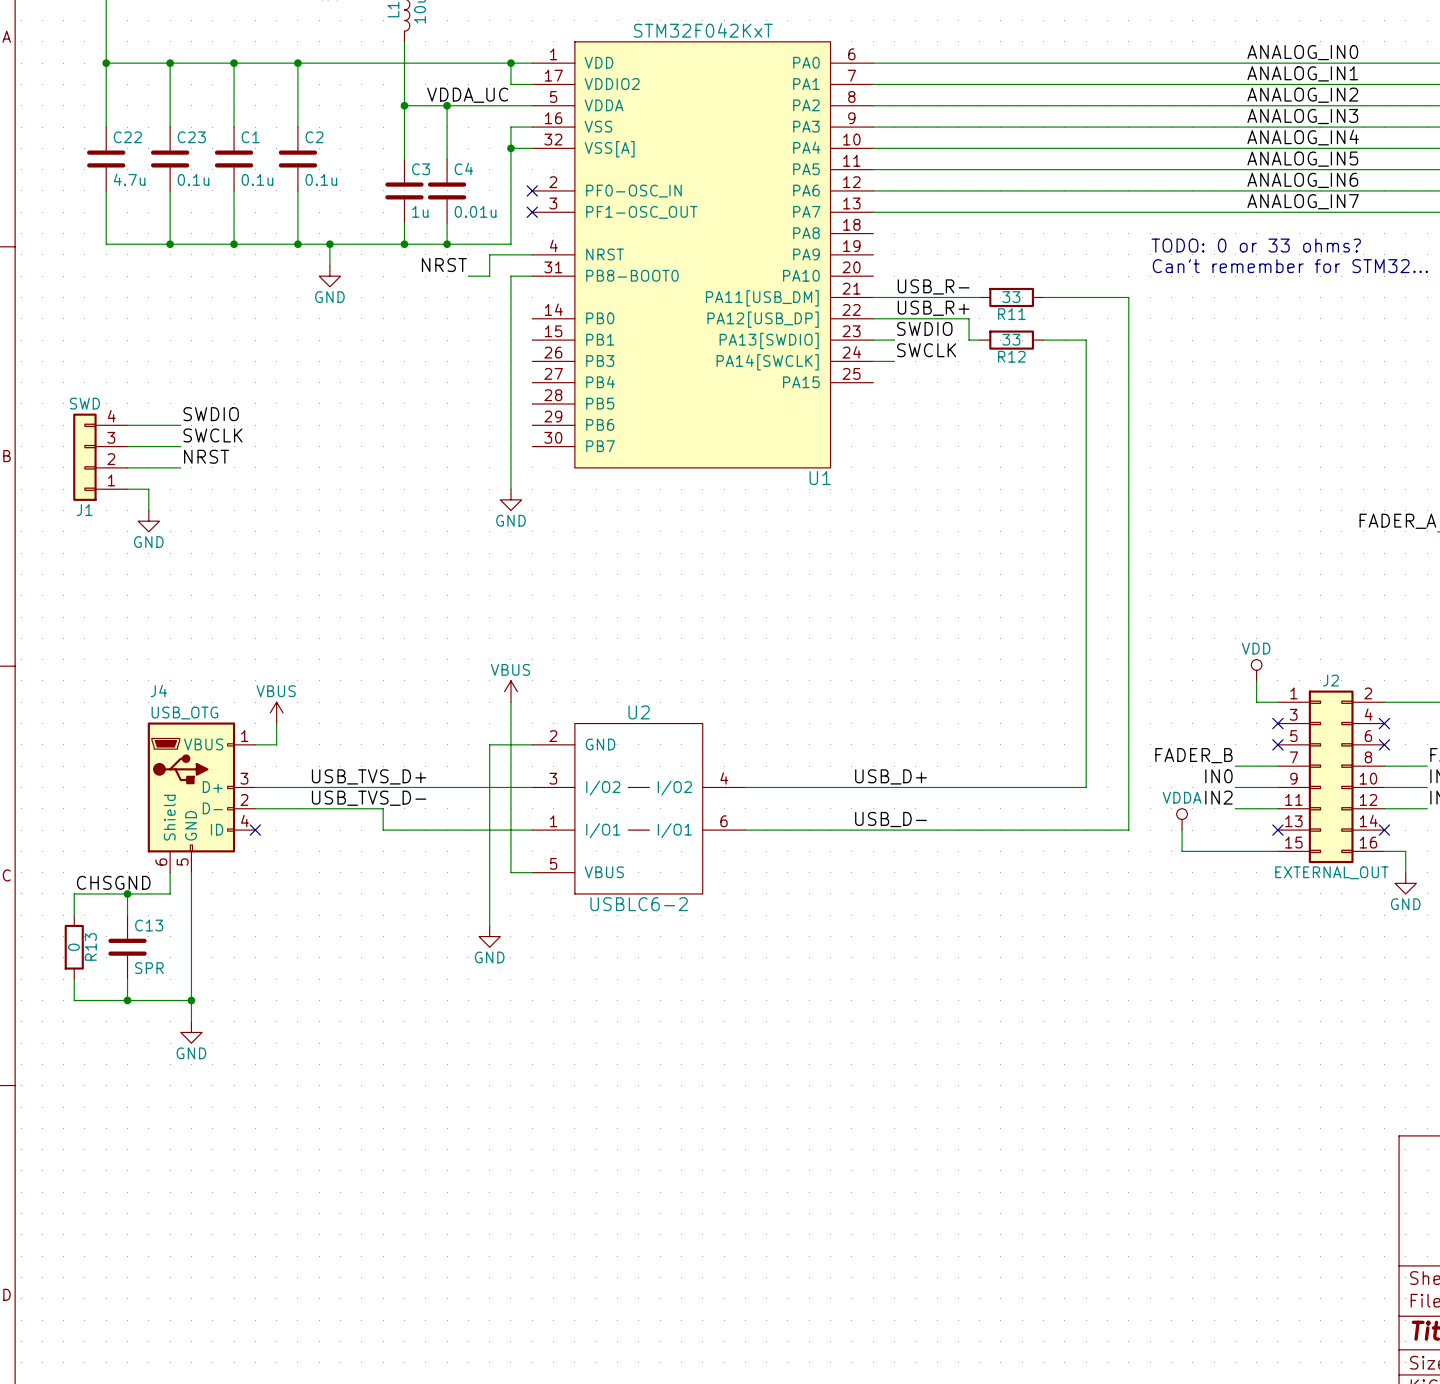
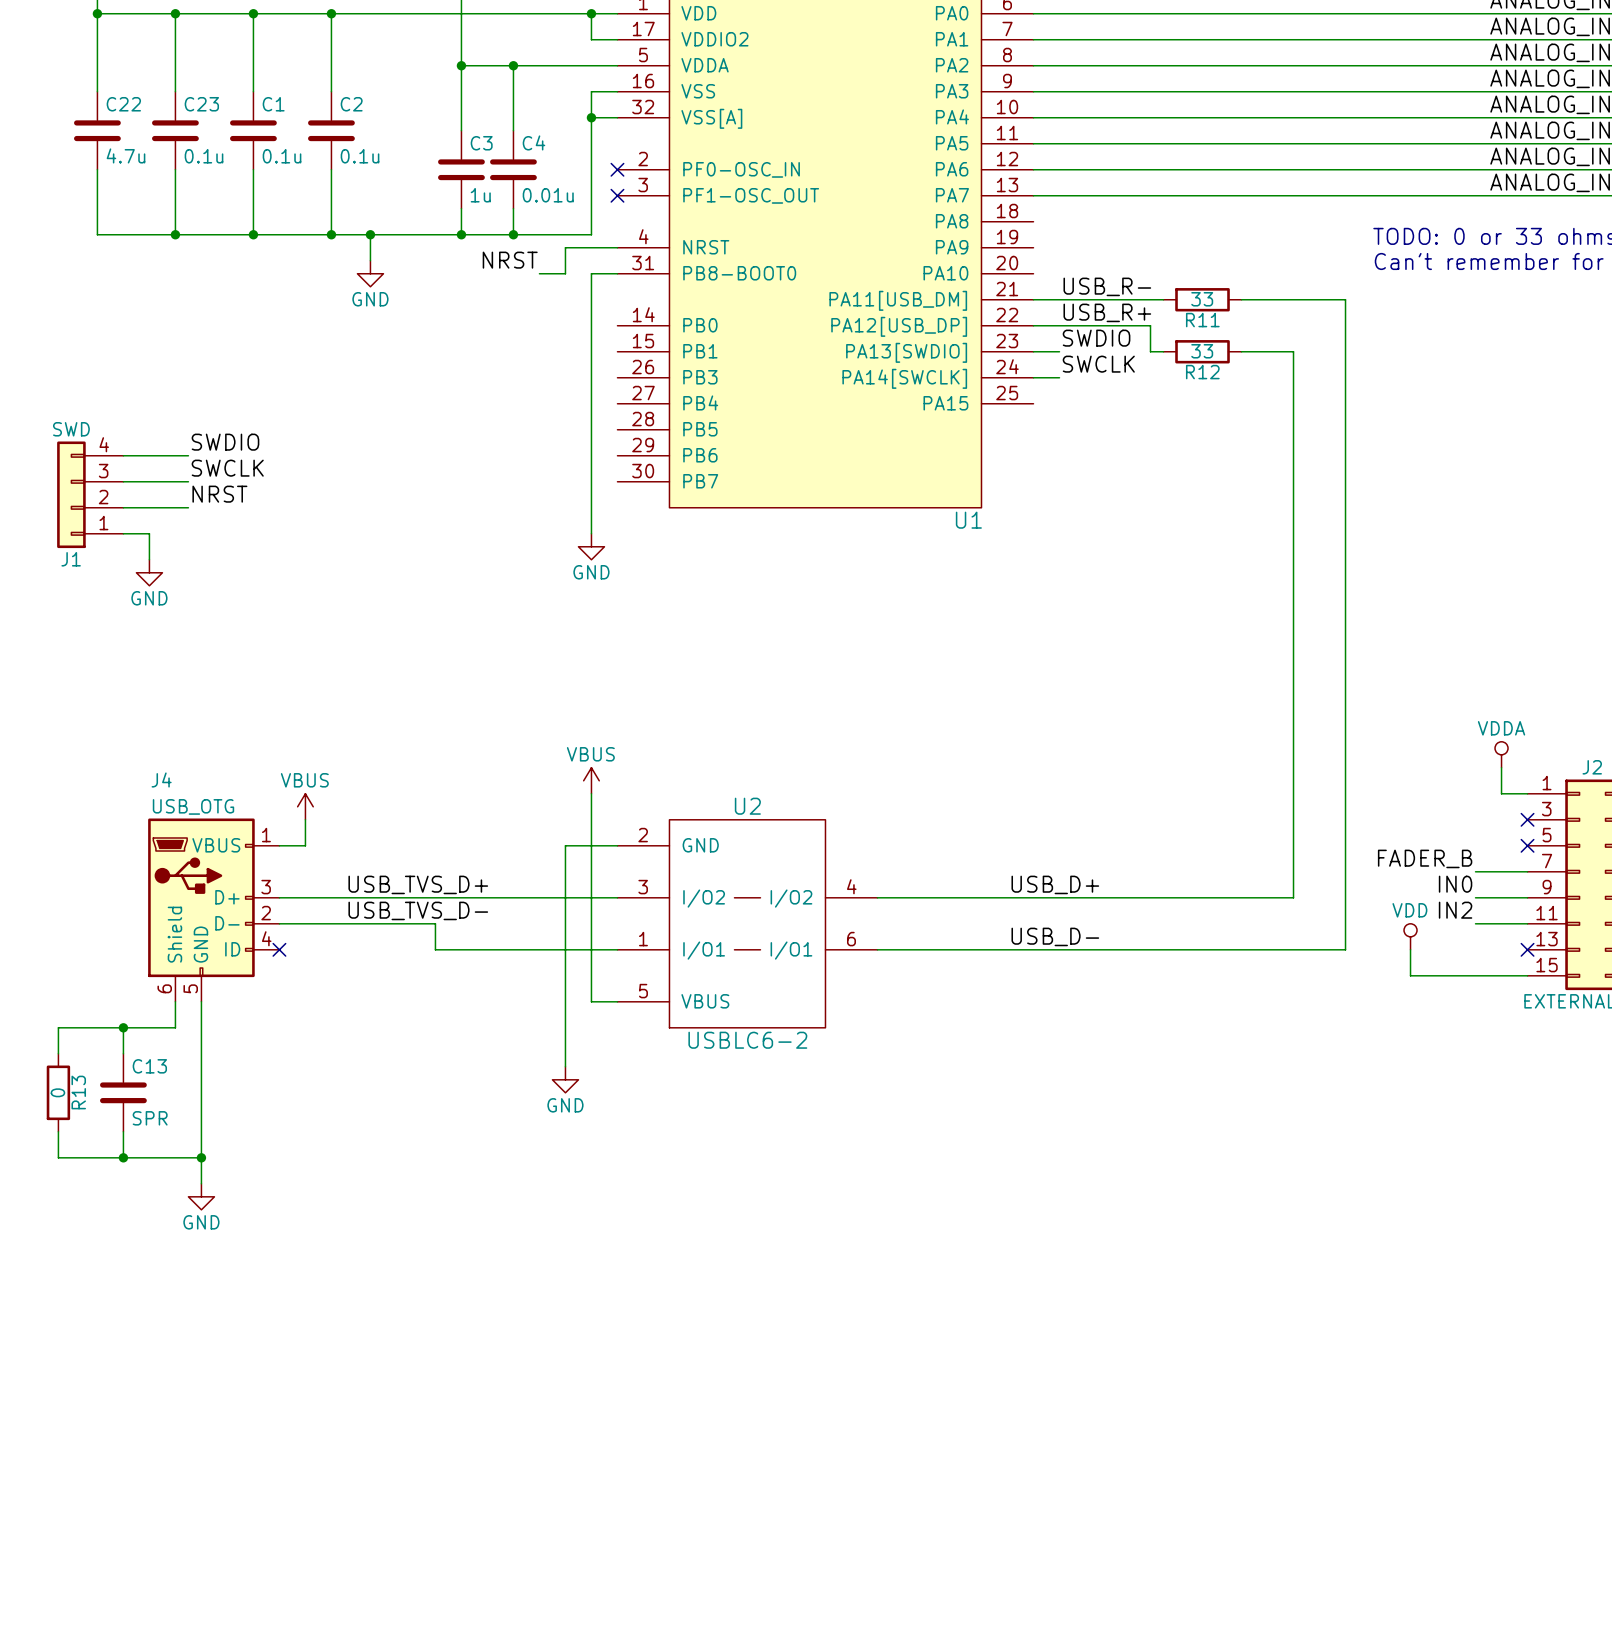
label: VDDA_UC (467, 95) -> none
power symbol: VDD (1256, 670) -> VDDA (1501, 754)
power symbol: VDDA (1182, 819) -> VDD (1410, 936)
label: CHSGND (113, 882) -> none

